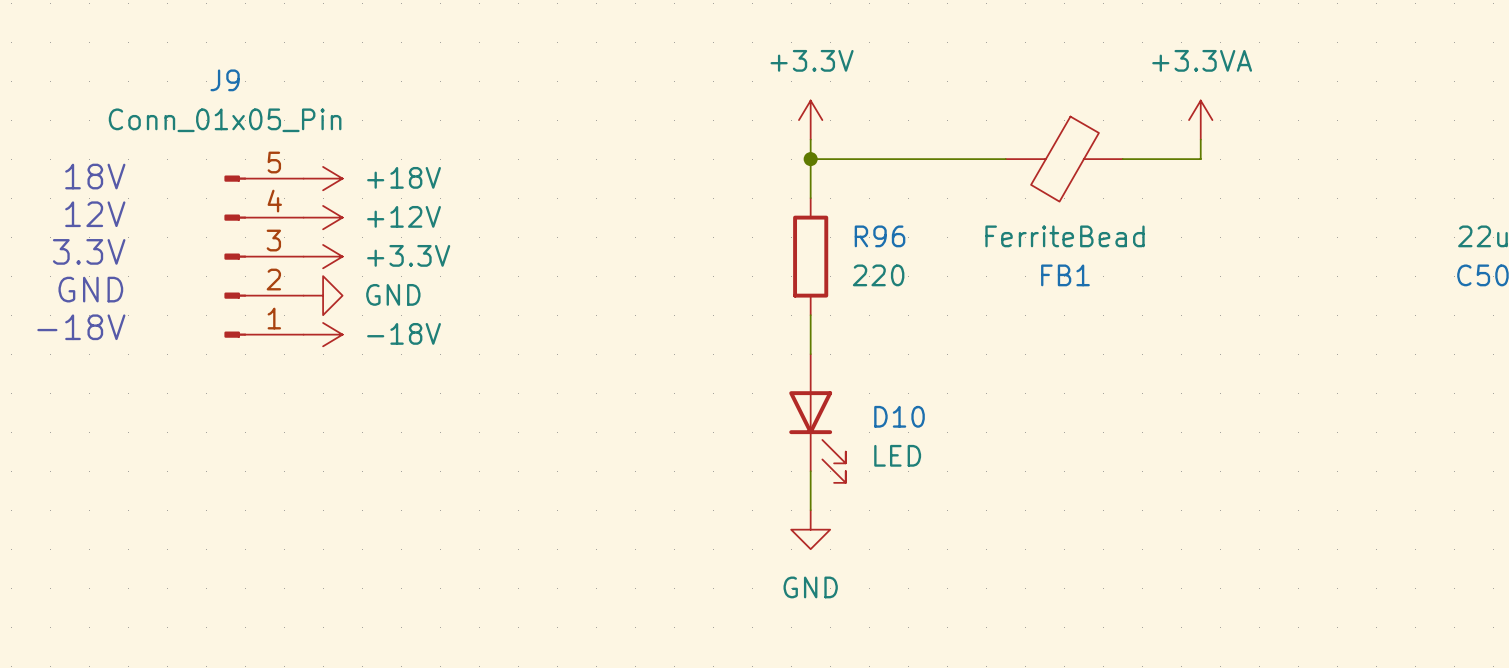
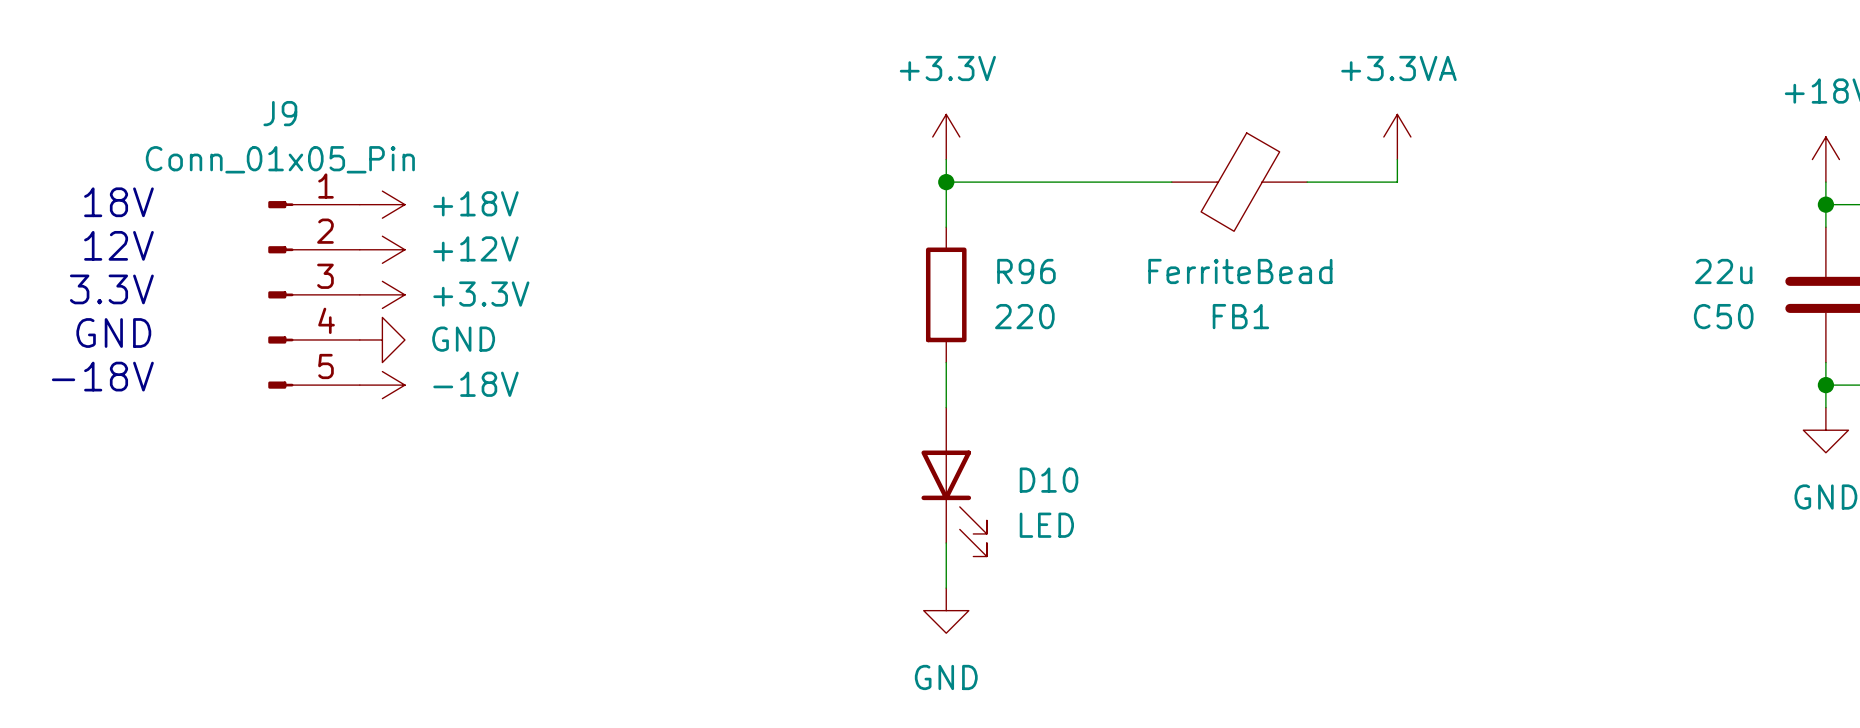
J9 flip: as is (235, 256) -> up-down (280, 294)

